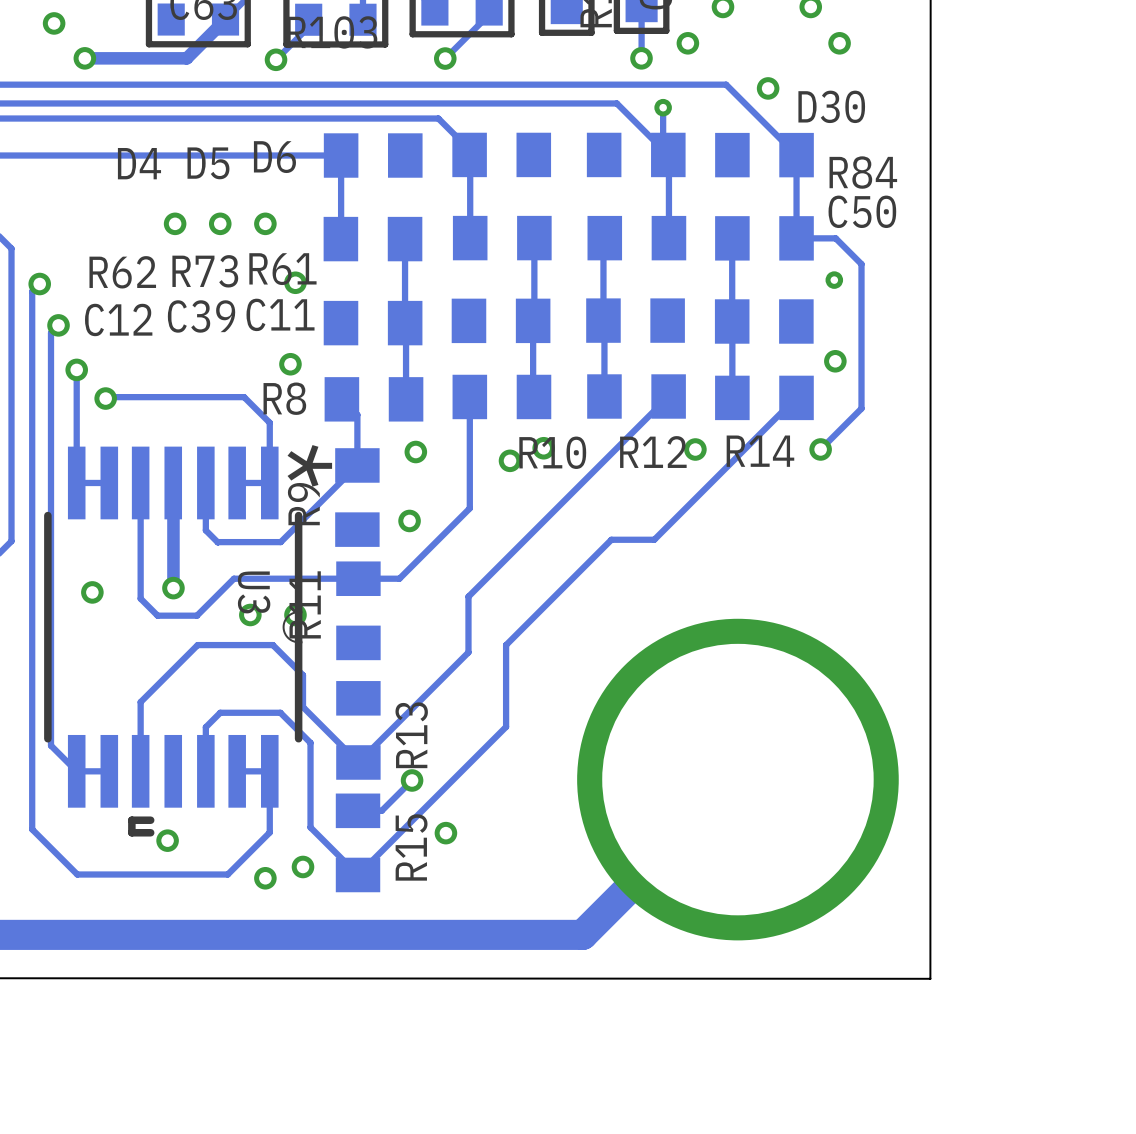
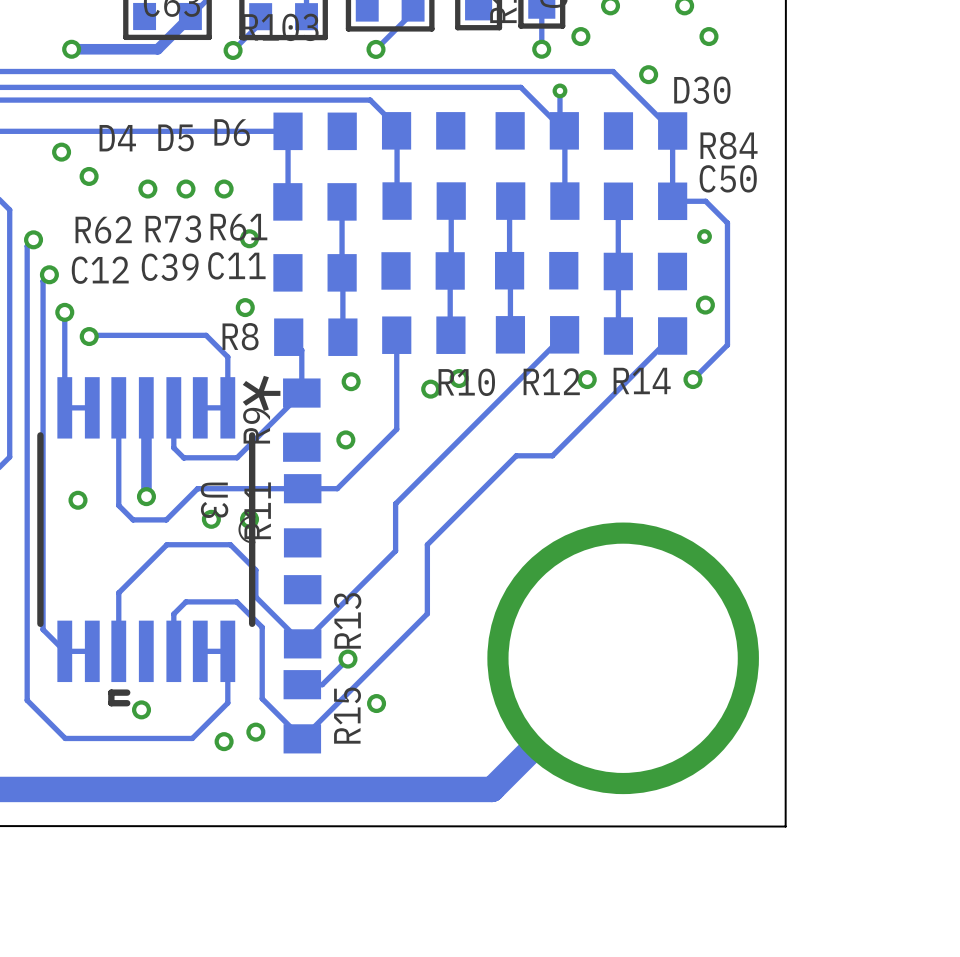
via: (54, 23) -> none
via: none -> (61, 152)
via: none -> (89, 176)

